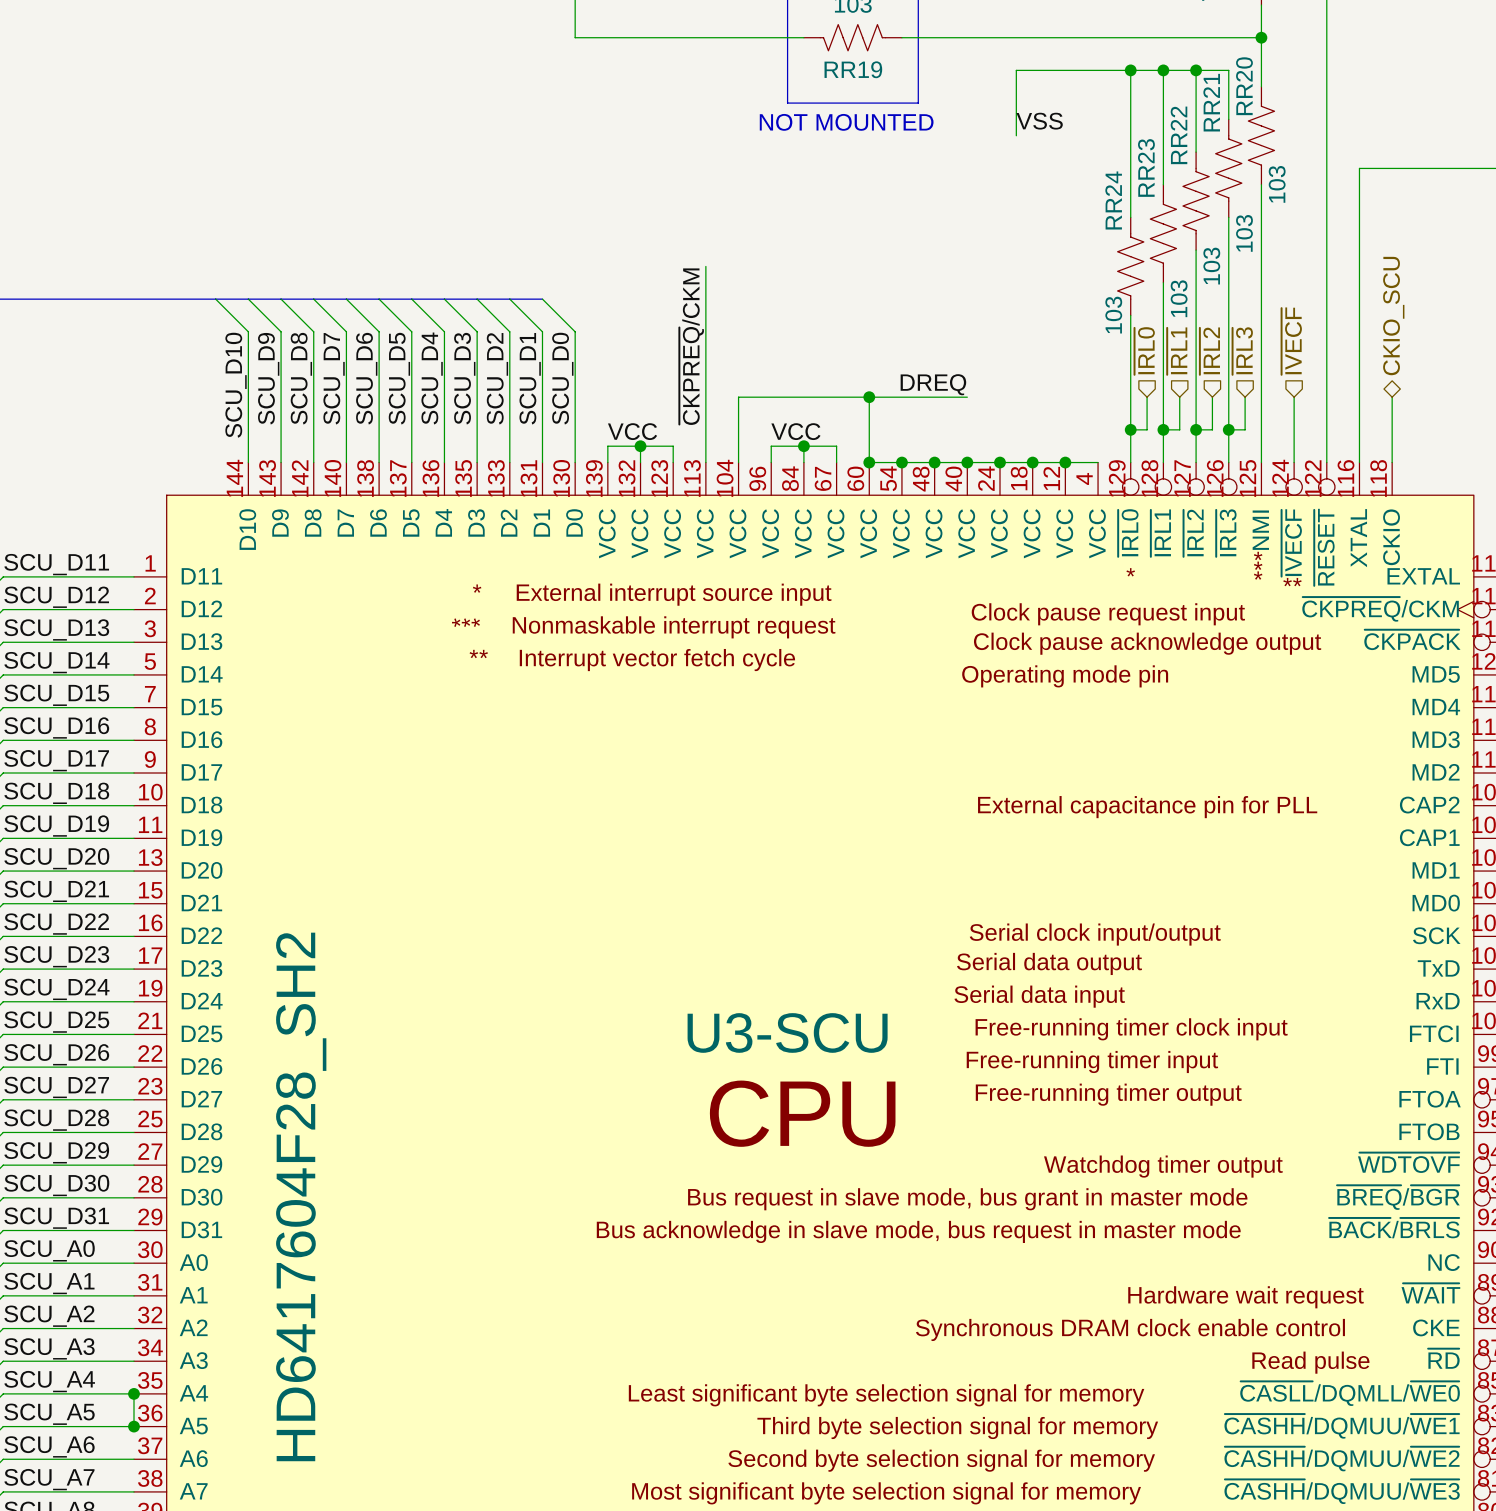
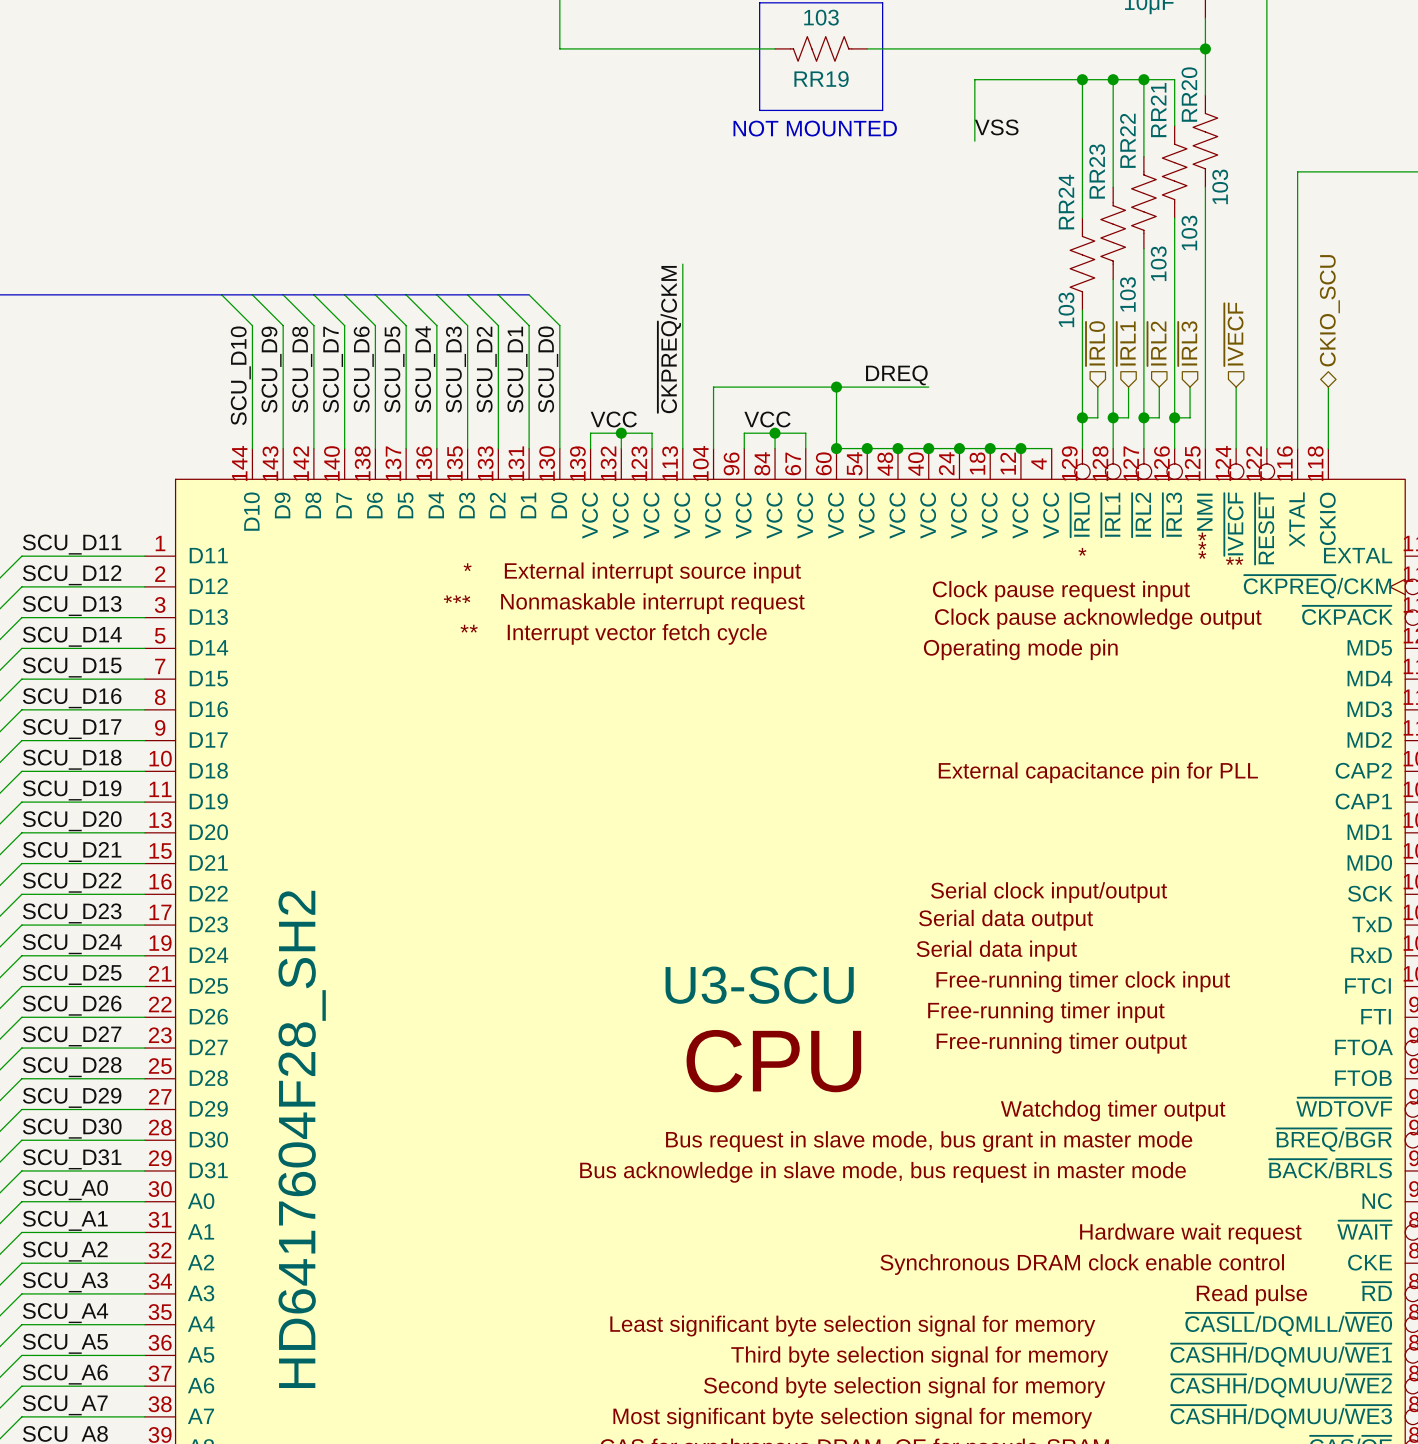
wire: (133, 1393) (133, 1426) -> none
junction: (133, 1393) -> none
junction: (133, 1426) -> none

